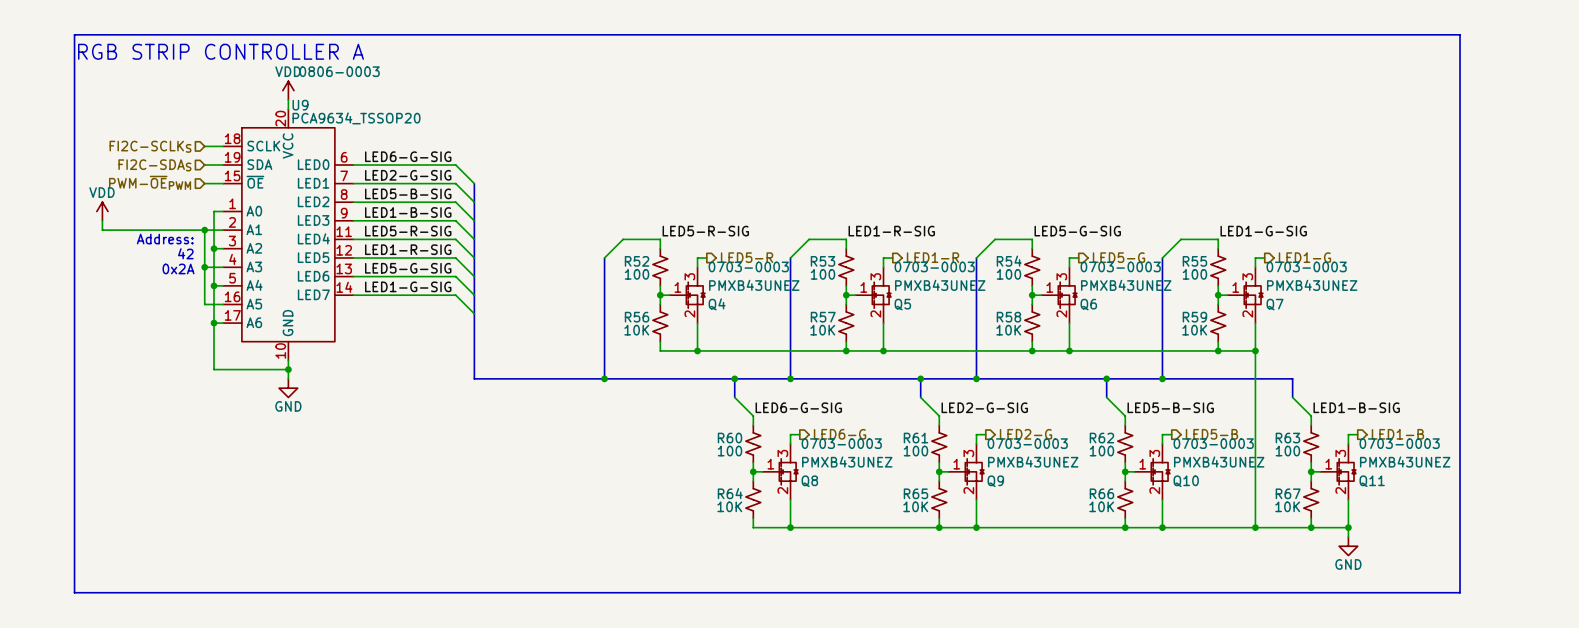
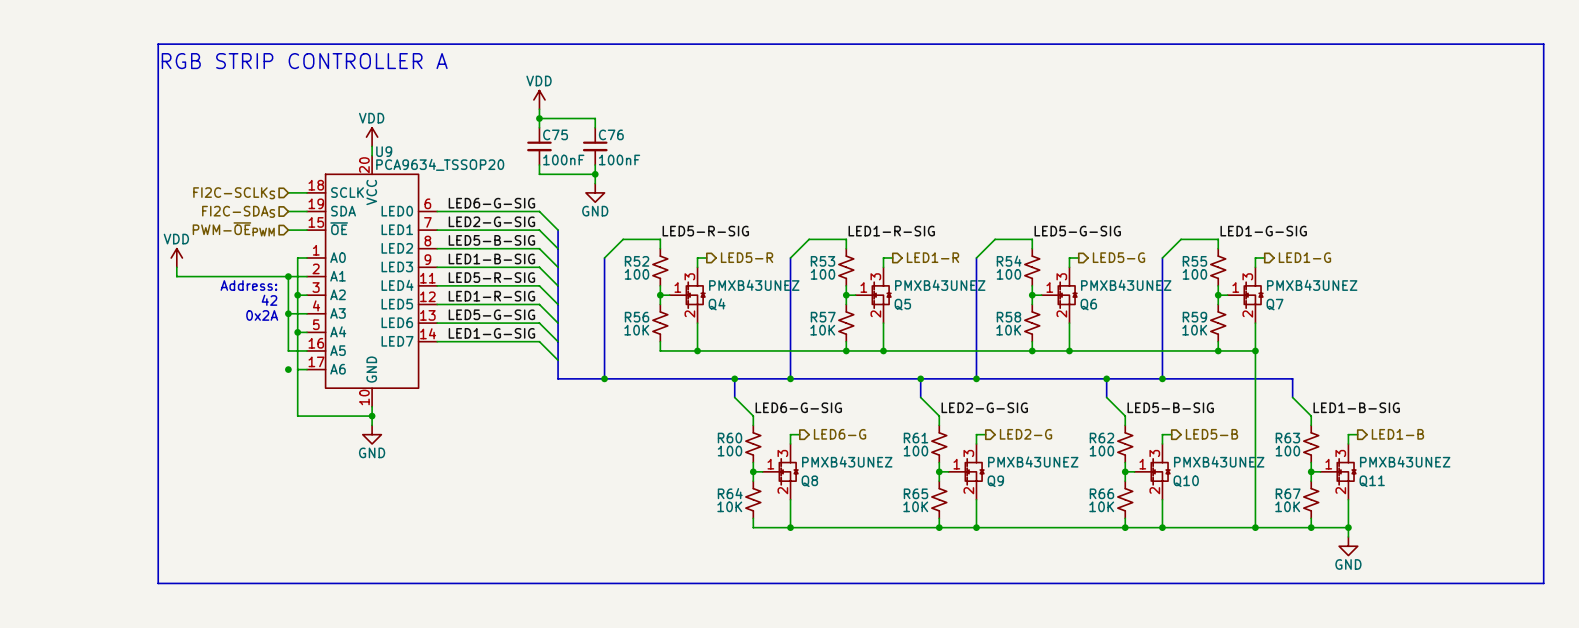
line: (74, 34) (74, 592) (1460, 592) (1460, 34) (74, 34) -> (158, 44) (158, 583) (1543, 583) (1543, 44) (158, 44)
text position: RGB STRIP CONTROLLER A (221, 51) -> RGB STRIP CONTROLLER A (304, 61)
U9 text: 0806-0003 (339, 71) -> none
power symbol position: VDD (288, 90) -> VDD (372, 137)
wire: (288, 99) (288, 109) -> (372, 146) (372, 155)
power symbol: none -> VDD (539, 99)
wire: none -> (539, 109) (539, 127)
wire: none -> (539, 118) (595, 118) (595, 127)
junction: none -> (539, 118)
hierarchical label position: FI2C-SCLKS (150, 146) -> FI2C-SCLKS (234, 193)
wire: (204, 146) (223, 146) -> (288, 192) (306, 192)
C75: none -> 100nF (539, 146)
C76: none -> 100nF (595, 146)
label position: LED6-G-SIG (408, 156) -> LED6-G-SIG (491, 203)
hierarchical label position: FI2C-SDAS (154, 165) -> FI2C-SDAS (238, 211)
wire: (204, 165) (223, 165) -> (288, 211) (306, 211)
wire: (353, 165) (455, 165) (474, 183) -> (437, 211) (539, 211) (558, 230)
wire: none -> (539, 165) (539, 174) (595, 174)
wire: none -> (595, 165) (595, 183)
junction: none -> (595, 174)
label position: LED2-G-SIG (408, 175) -> LED2-G-SIG (491, 221)
hierarchical label position: PWM-~{OE}PWM (150, 182) -> PWM-~{OE}PWM (233, 229)
wire: (204, 183) (223, 183) -> (288, 230) (306, 230)
wire: (353, 183) (455, 183) (474, 202) -> (437, 230) (539, 230) (558, 248)
bus: (474, 183) (474, 378) (558, 378) -> (558, 230) (558, 378)
power symbol: none -> GND (595, 192)
label position: LED5-B-SIG (408, 193) -> LED5-B-SIG (491, 240)
wire: (353, 202) (455, 202) (474, 220) -> (437, 248) (539, 248) (558, 267)
power symbol position: VDD (102, 211) -> VDD (176, 257)
wire: (223, 211) (214, 211) (214, 369) (288, 369) -> (306, 257) (297, 257) (297, 416) (372, 416)
label position: LED1-B-SIG (408, 212) -> LED1-B-SIG (491, 258)
wire: (102, 220) (102, 230) (223, 230) -> none
wire: (353, 220) (455, 220) (474, 239) -> (437, 267) (539, 267) (558, 285)
wire: (204, 230) (204, 304) (223, 304) -> (288, 276) (288, 350) (306, 350)
junction: (204, 230) -> none
label position: LED5-R-SIG (408, 231) -> LED5-R-SIG (491, 277)
U9 position: (288, 234) -> (372, 281)
text position: Address: (165, 239) -> Address: (248, 285)
wire: (353, 239) (455, 239) (474, 257) -> (437, 285) (539, 285) (558, 304)
wire: (214, 248) (223, 248) -> (297, 295) (306, 295)
junction: (214, 248) -> none
label position: LED1-R-SIG (408, 249) -> LED1-R-SIG (491, 296)
text position: 42 (185, 253) -> 42 (269, 300)
wire: (353, 257) (455, 257) (474, 276) -> (437, 304) (539, 304) (558, 323)
Q4 text: 0703-0003 (748, 266) -> none
Q5 text: 0703-0003 (934, 266) -> none
Q6 text: 0703-0003 (1120, 266) -> none
Q7 text: 0703-0003 (1306, 266) -> none
wire: none -> (176, 267) (176, 276) (306, 276)
wire: (204, 267) (223, 267) -> (288, 313) (306, 313)
junction: (204, 267) -> none
text position: 0x2A (178, 268) -> 0x2A (262, 315)
label position: LED5-G-SIG (408, 268) -> LED5-G-SIG (491, 314)
junction: none -> (288, 276)
wire: (353, 276) (455, 276) (474, 295) -> (437, 323) (539, 323) (558, 341)
wire: (214, 285) (223, 285) -> (297, 332) (306, 332)
junction: (214, 285) -> none
label position: LED1-G-SIG (408, 286) -> LED1-G-SIG (491, 333)
junction: none -> (297, 295)
wire: (353, 295) (455, 295) (474, 313) -> (437, 341) (539, 341) (558, 360)
junction: none -> (288, 313)
wire: (214, 323) (223, 323) -> (297, 369) (306, 369)
junction: (214, 323) -> none
junction: none -> (297, 332)
wire: (288, 360) (288, 378) -> (372, 406) (372, 425)
power symbol position: GND (288, 388) -> GND (372, 434)
junction: none -> (372, 416)
Q8 text: 0703-0003 (841, 443) -> none
Q9 text: 0703-0003 (1027, 443) -> none
Q10 text: 0703-0003 (1213, 443) -> none
Q11 text: 0703-0003 (1399, 443) -> none

